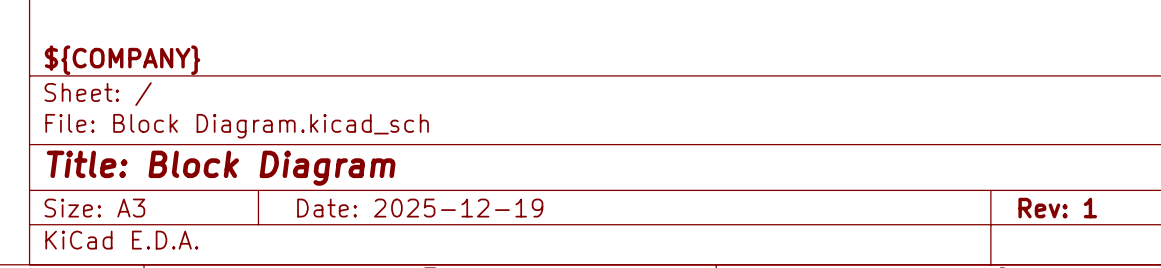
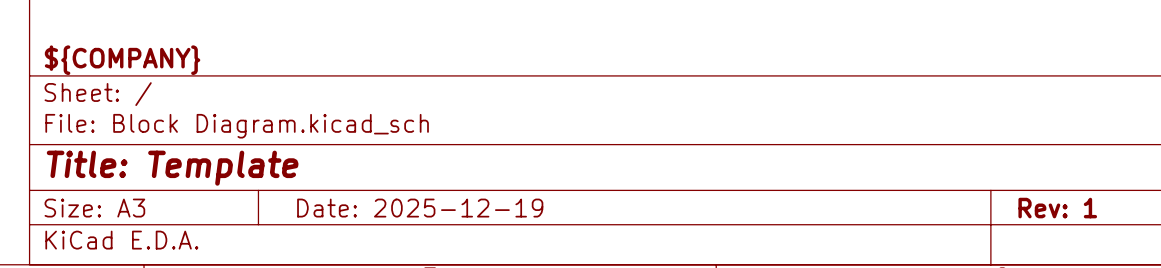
title block: Title: Block Diagram (221, 168) -> Title: Template (172, 168)

